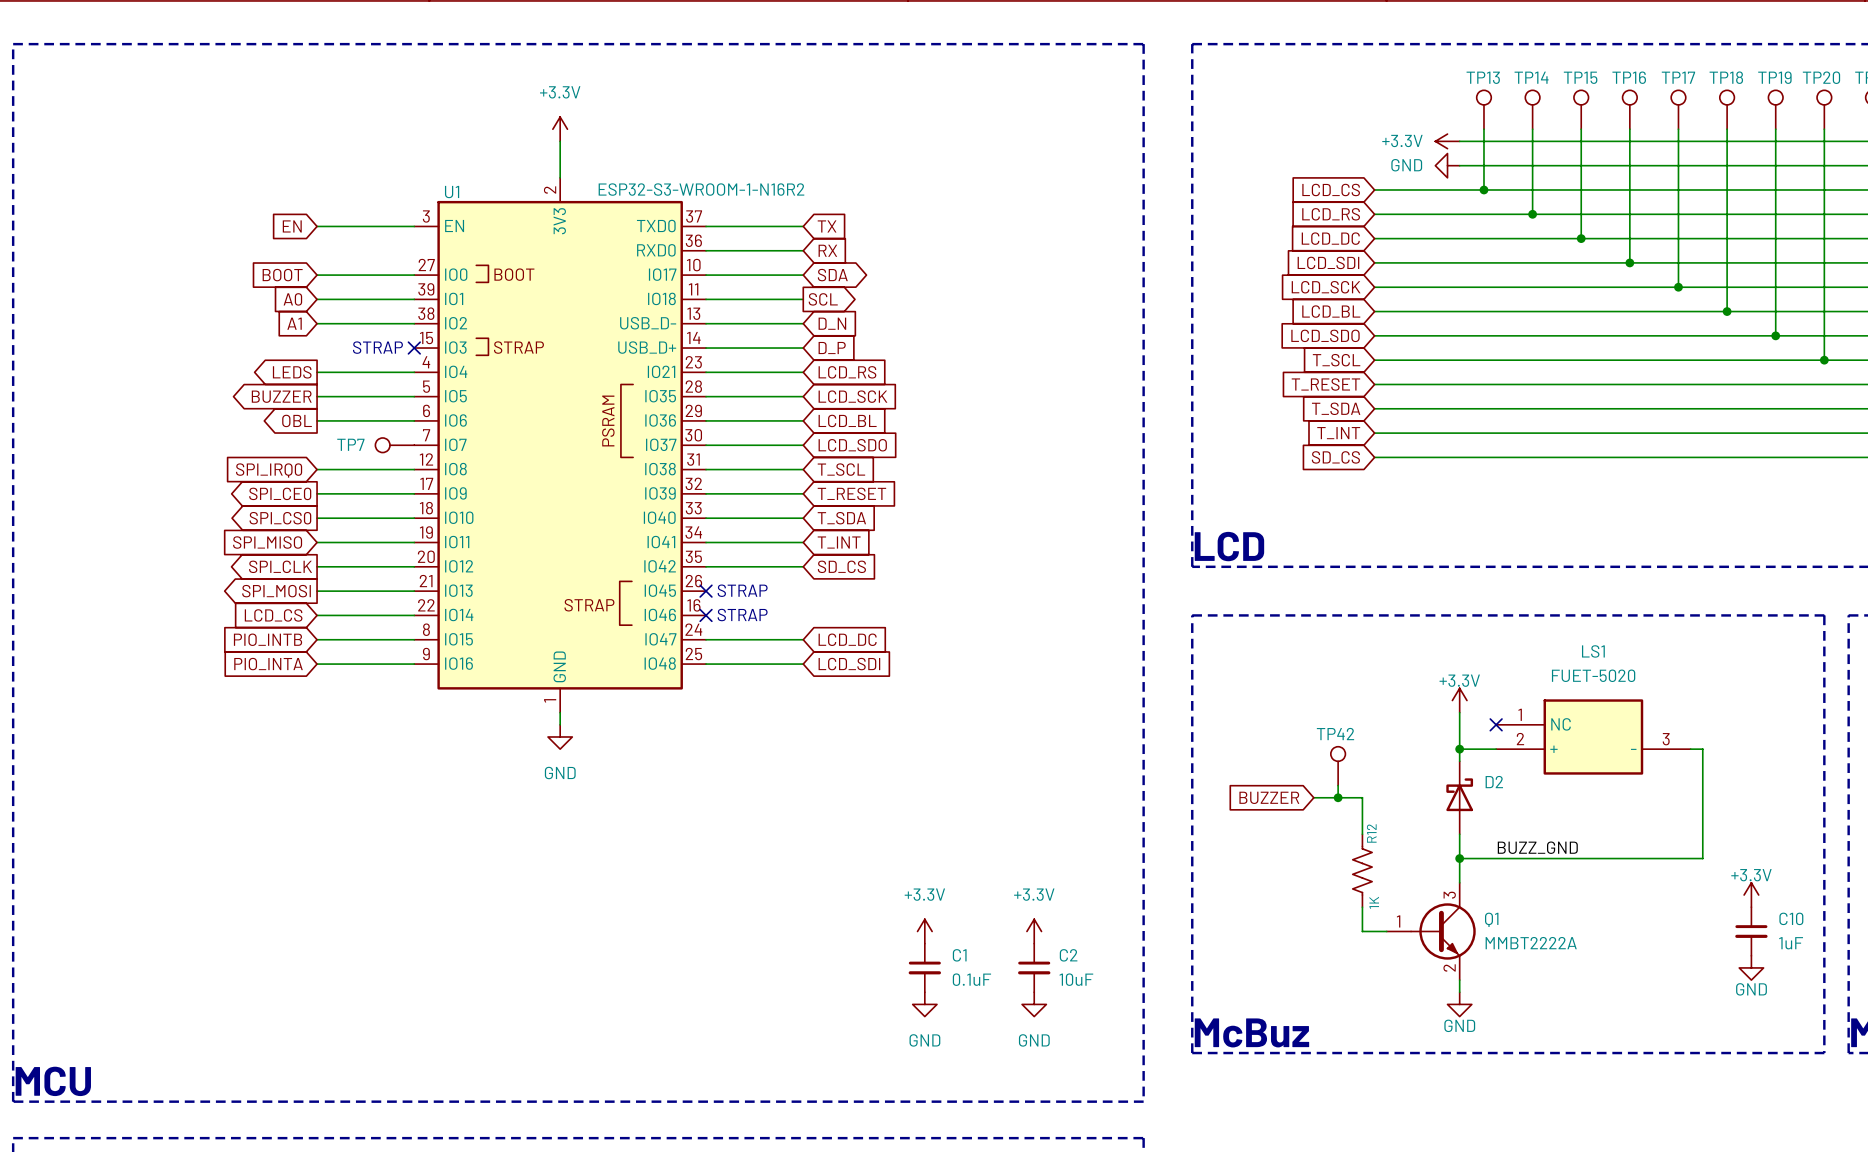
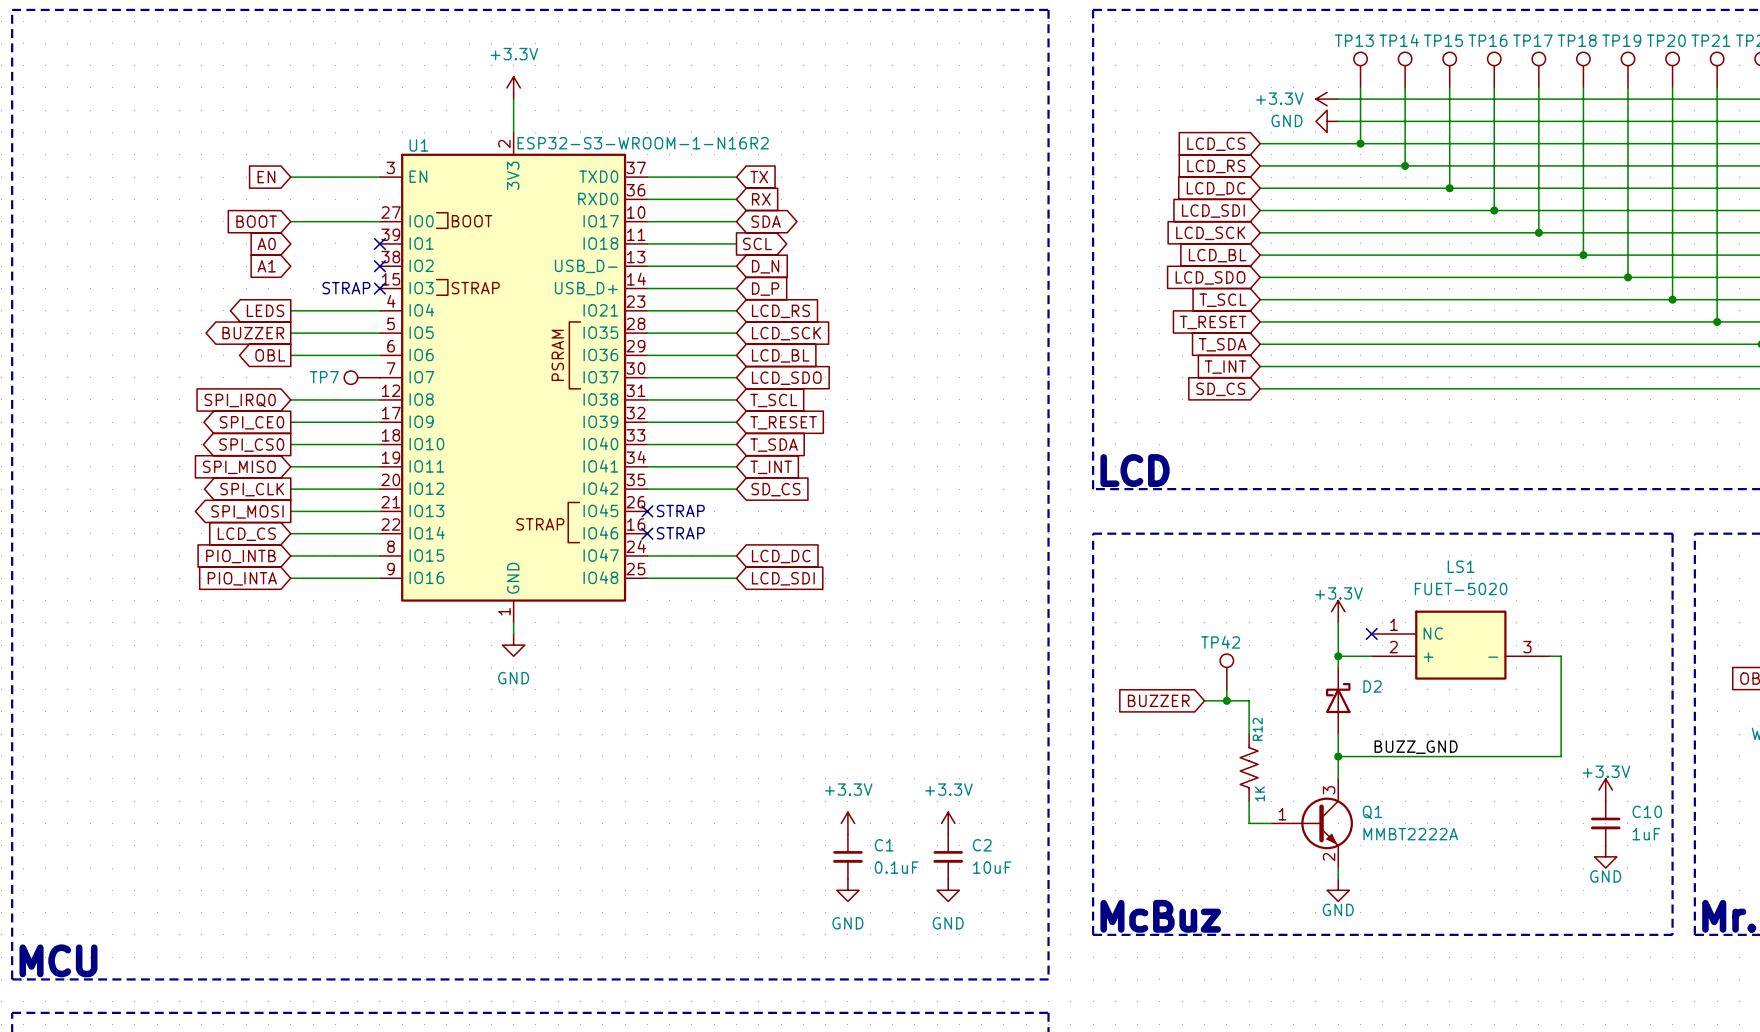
wire: (317, 299) (414, 299) -> none
no-connect mark: none -> (379, 243)
wire: (317, 323) (414, 323) -> none
no-connect mark: none -> (379, 266)

